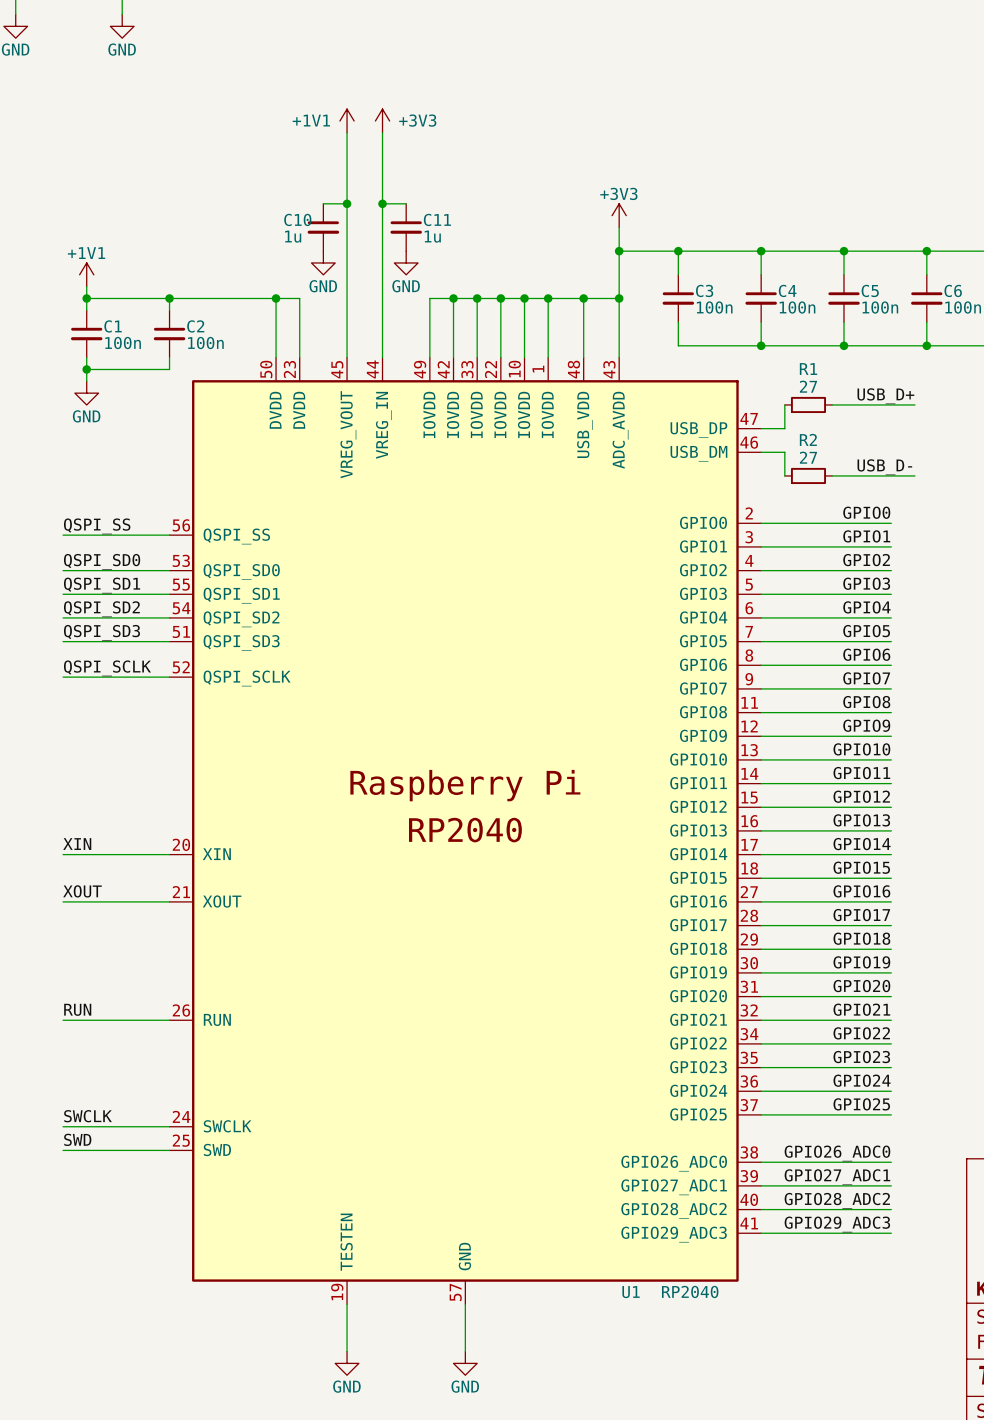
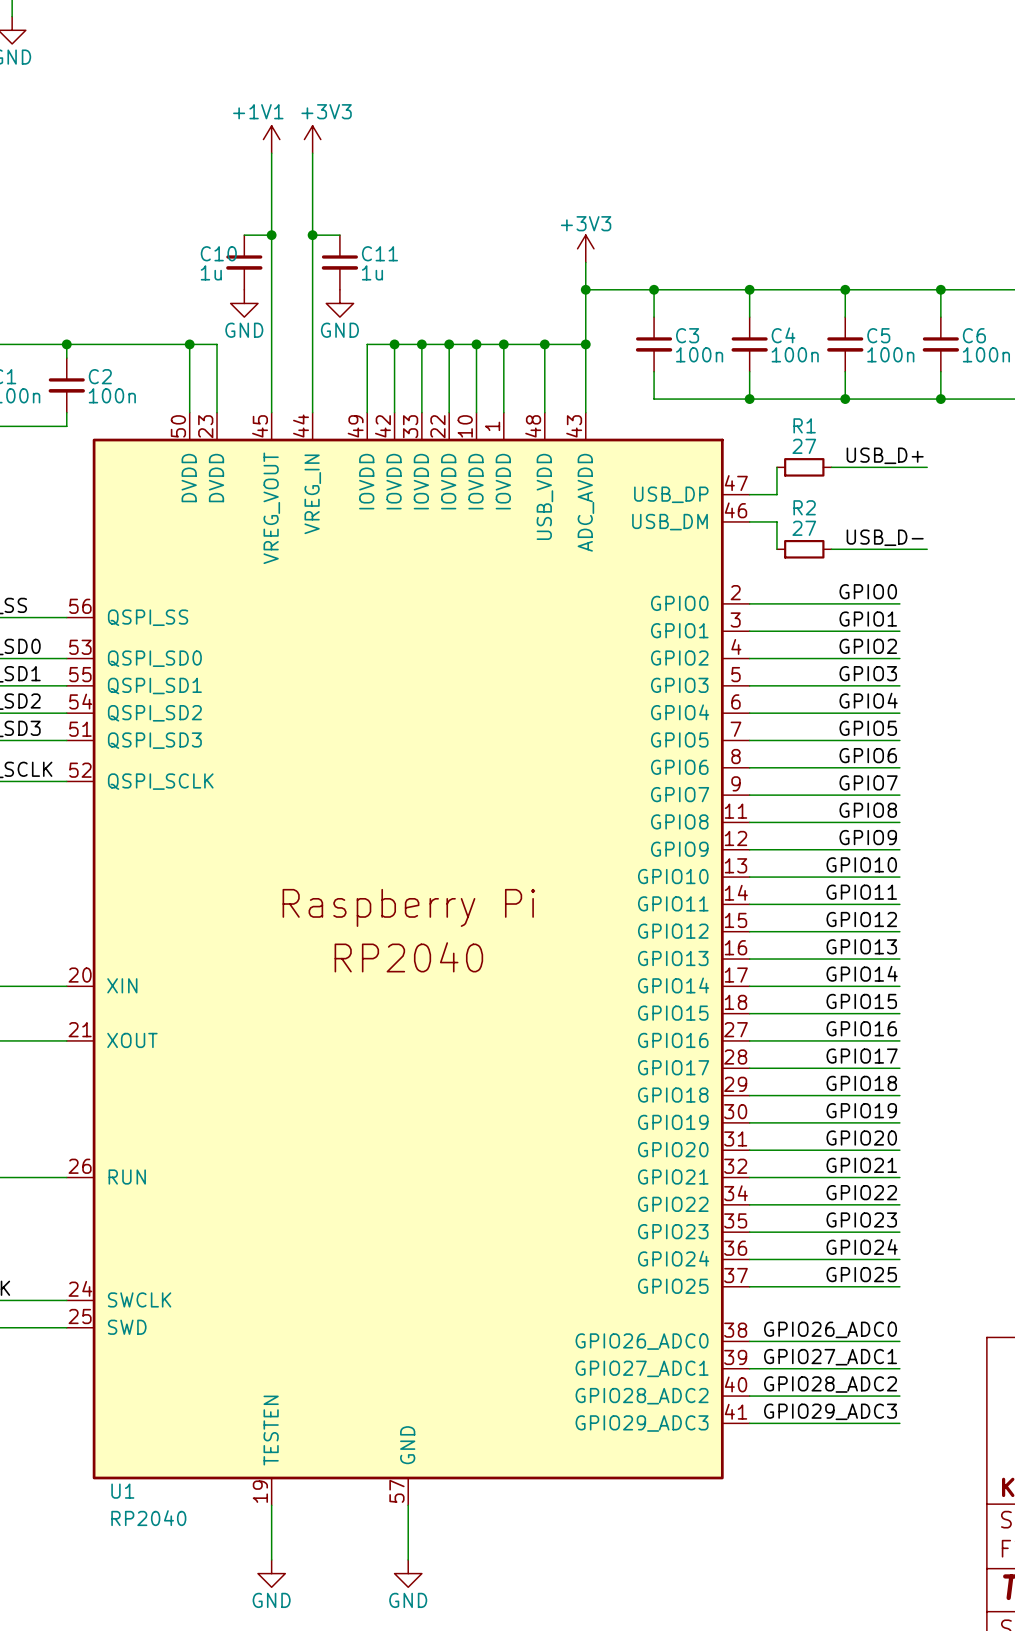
power symbol text position: +1V1 (311, 120) -> +1V1 (258, 111)
power symbol text position: +3V3 (417, 120) -> +3V3 (326, 111)
U1 value position: RP2040 (690, 1291) -> RP2040 (148, 1518)
U1 name position: U1 (631, 1292) -> U1 (122, 1491)

